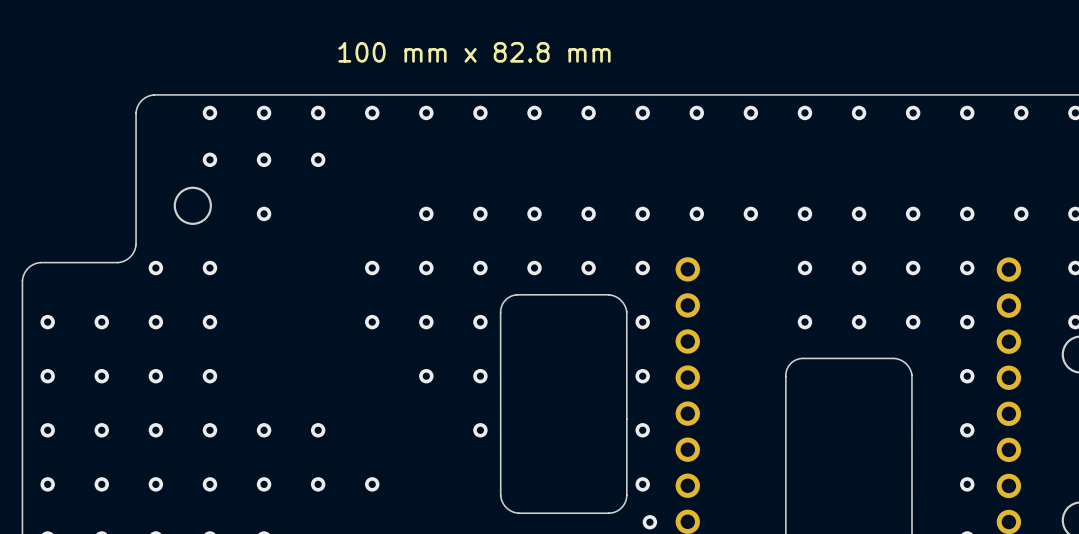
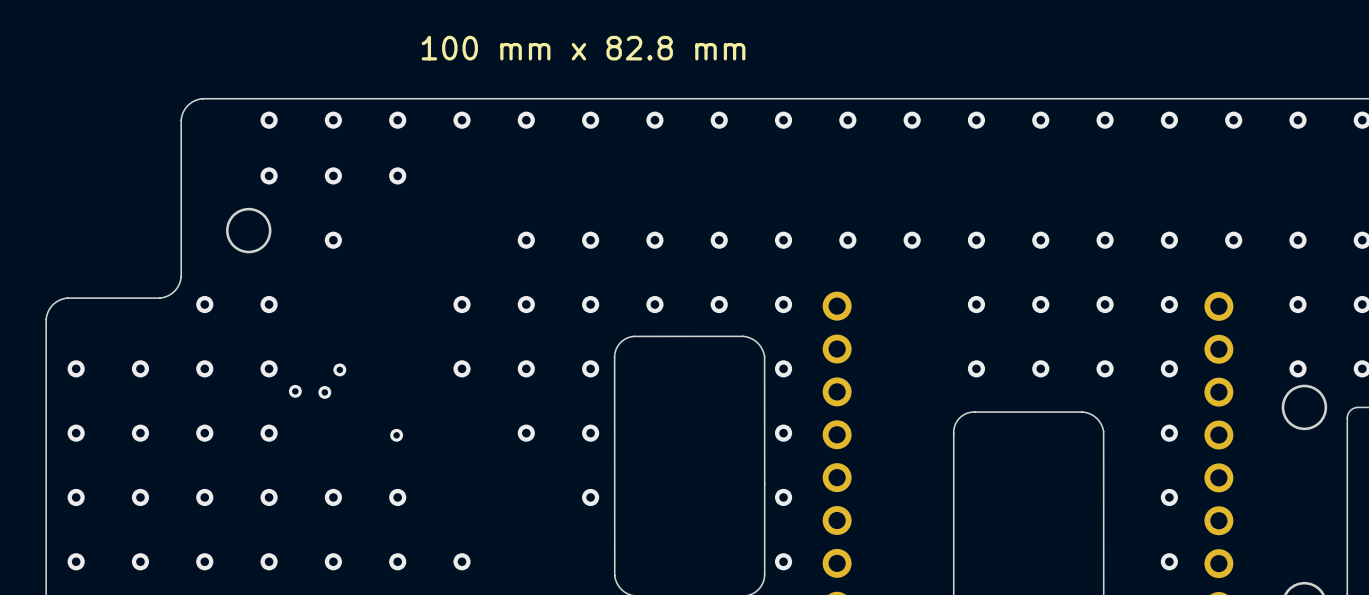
via: none -> (339, 369)
via: none -> (295, 391)
via: none -> (324, 392)
via: none -> (396, 435)

